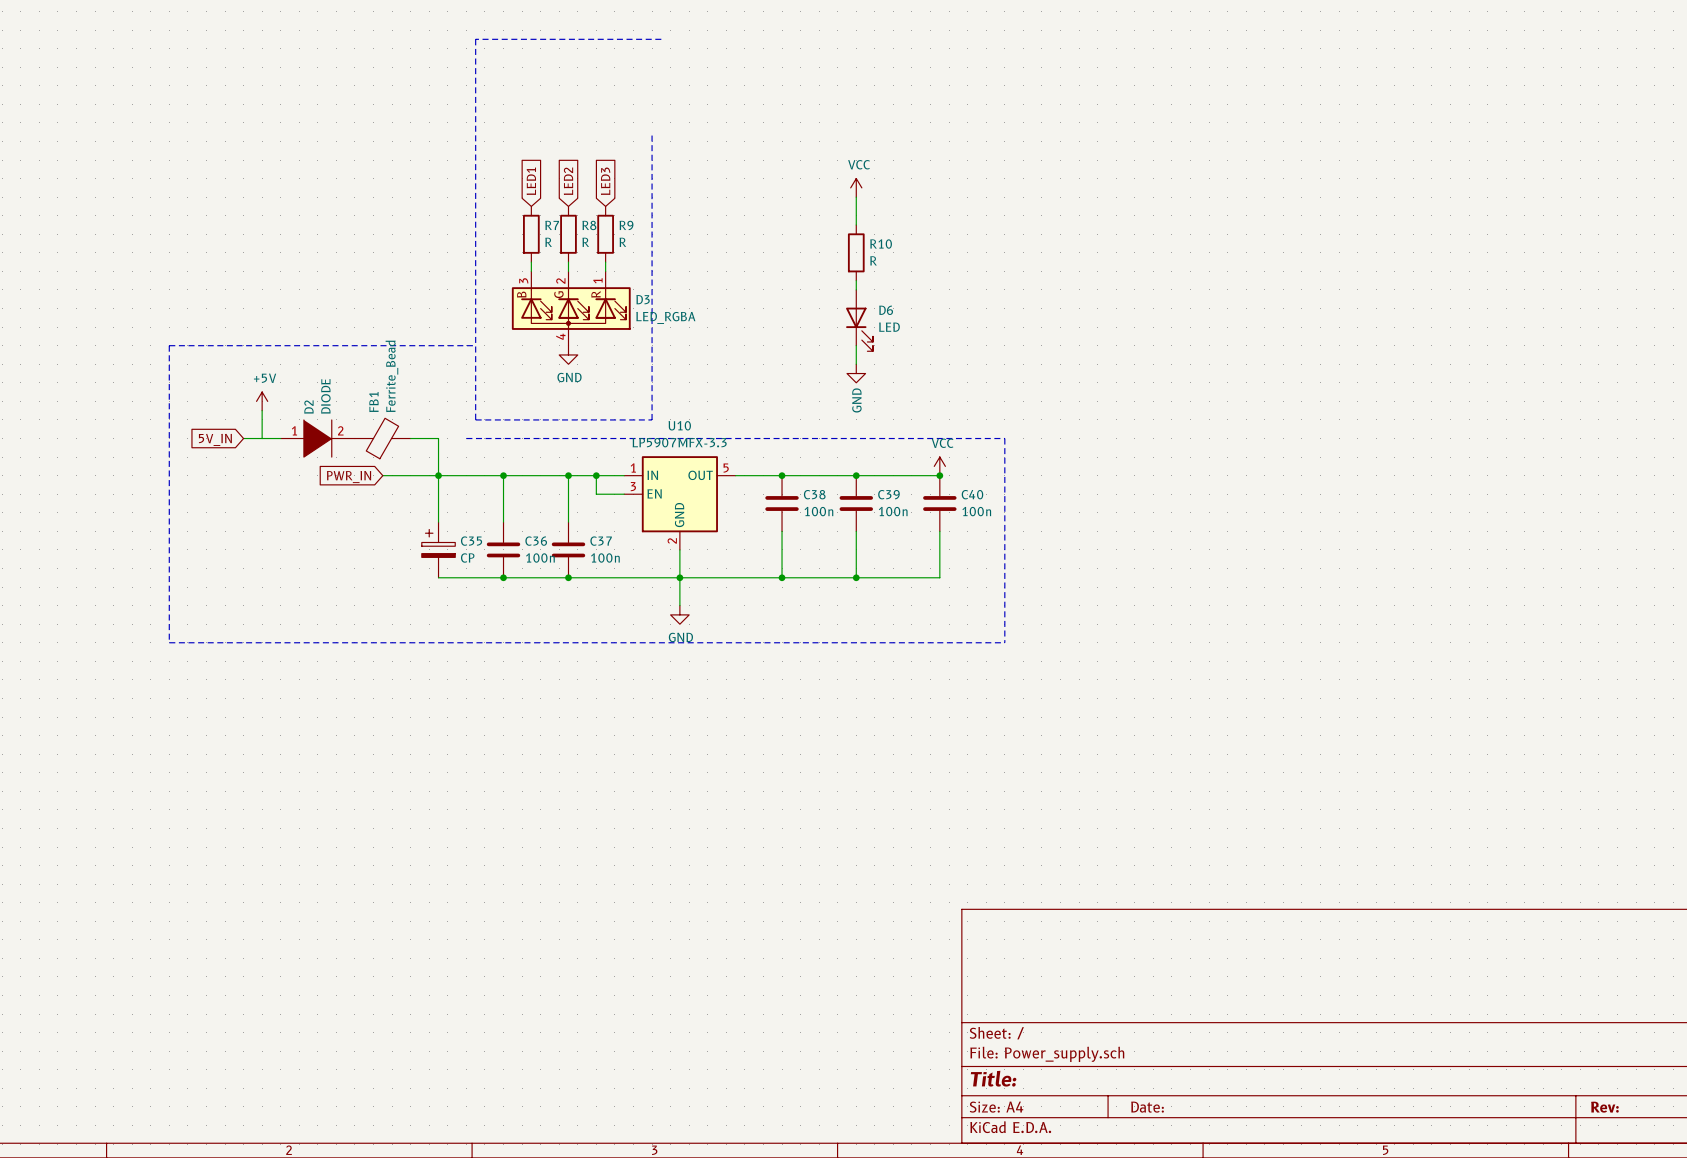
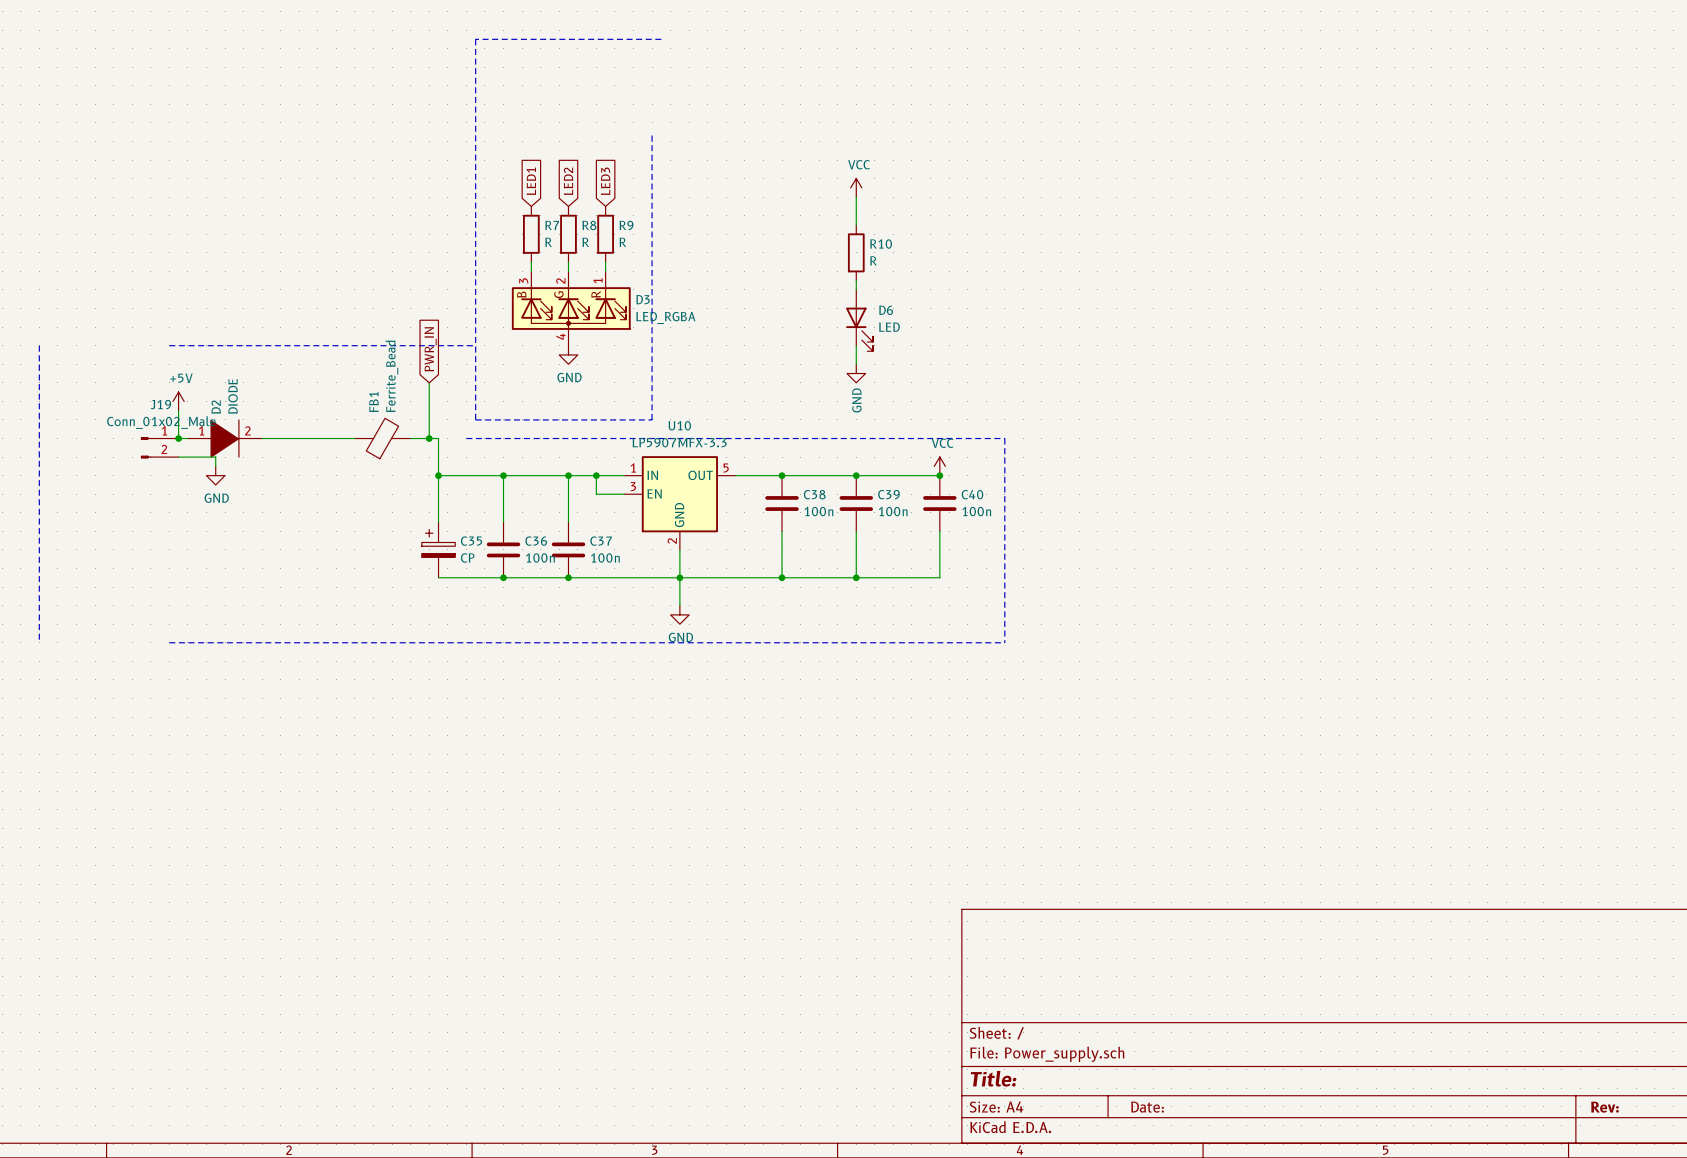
line: (169, 345) (169, 642) -> (39, 345) (39, 642)
wire: none -> (429, 382) (429, 438)
power symbol position: +5V (262, 401) -> +5V (178, 401)
wire: none -> (178, 410) (178, 438) (187, 438)
wire: (262, 410) (262, 438) (243, 438) -> none
junction: none -> (178, 438)
D2 position: (317, 438) -> (225, 438)
junction: none -> (429, 438)
global label: 5V_IN (215, 439) -> none
J19: none -> Conn_01x02_Male (159, 447)
wire: none -> (178, 457) (215, 457) (215, 466)
power symbol: none -> GND (215, 475)
wire: (382, 475) (438, 475) -> none
global label rotation: 0° (349, 477) -> 90° clockwise (430, 349)
global label position: PWR_IN (349, 477) -> PWR_IN (430, 349)

